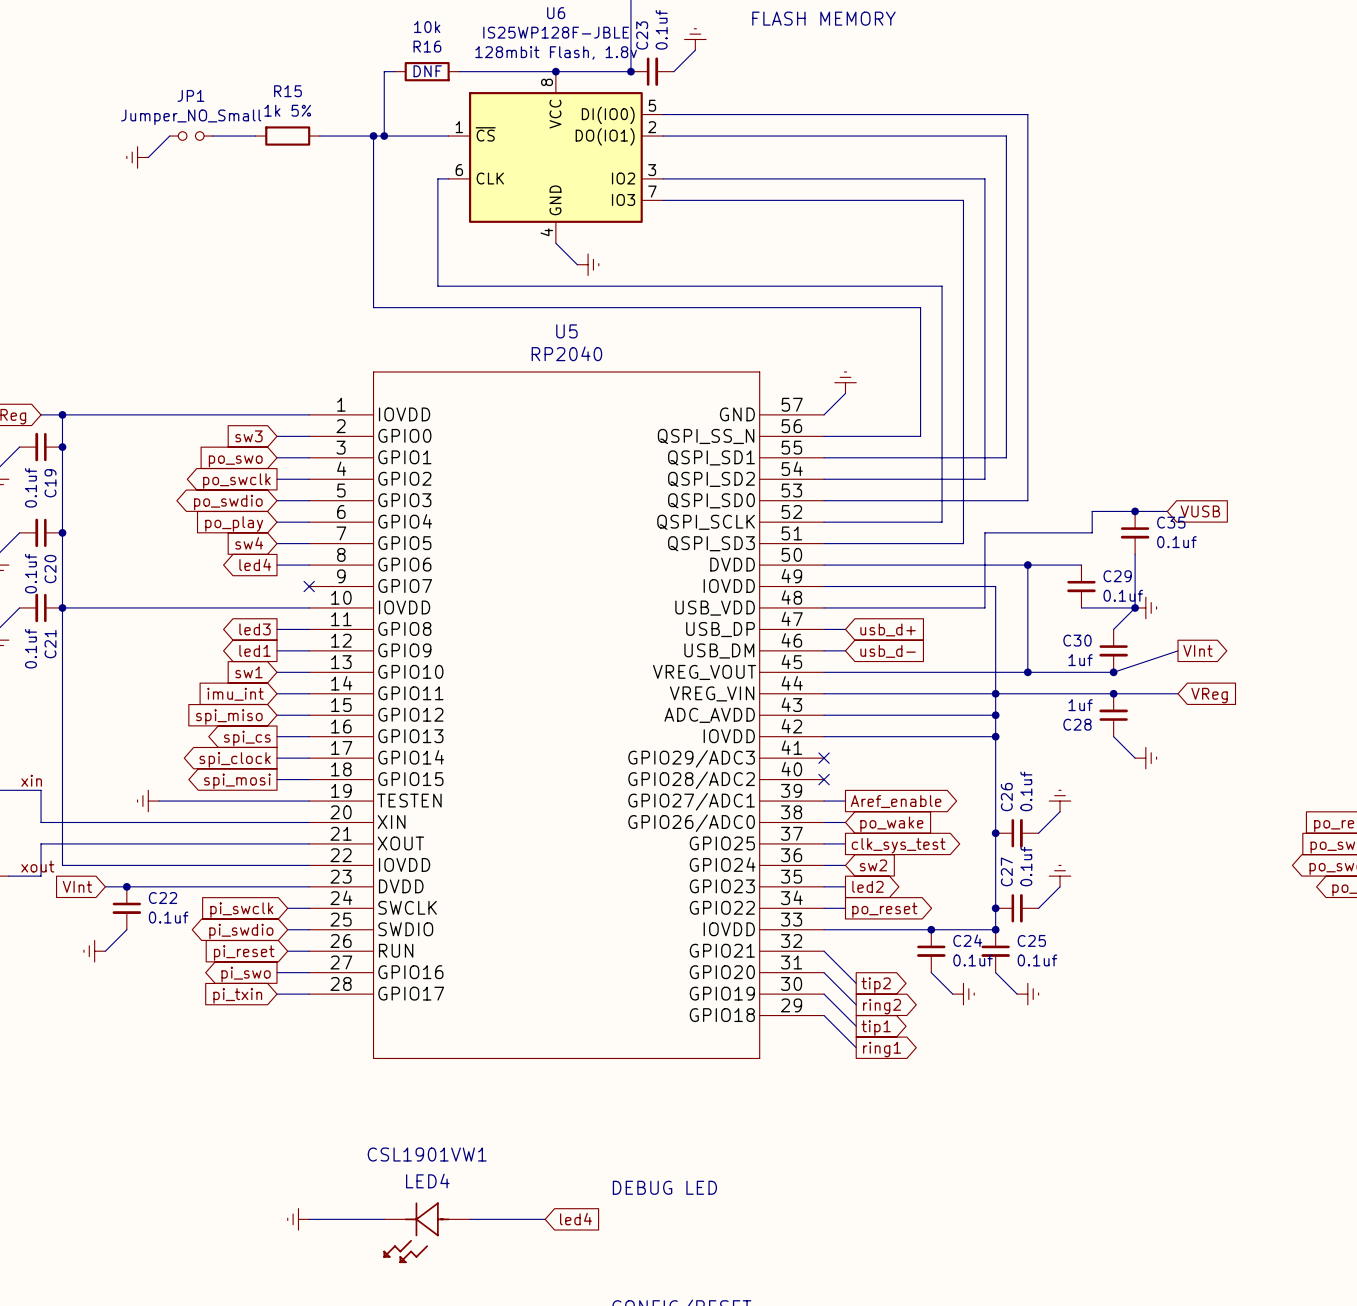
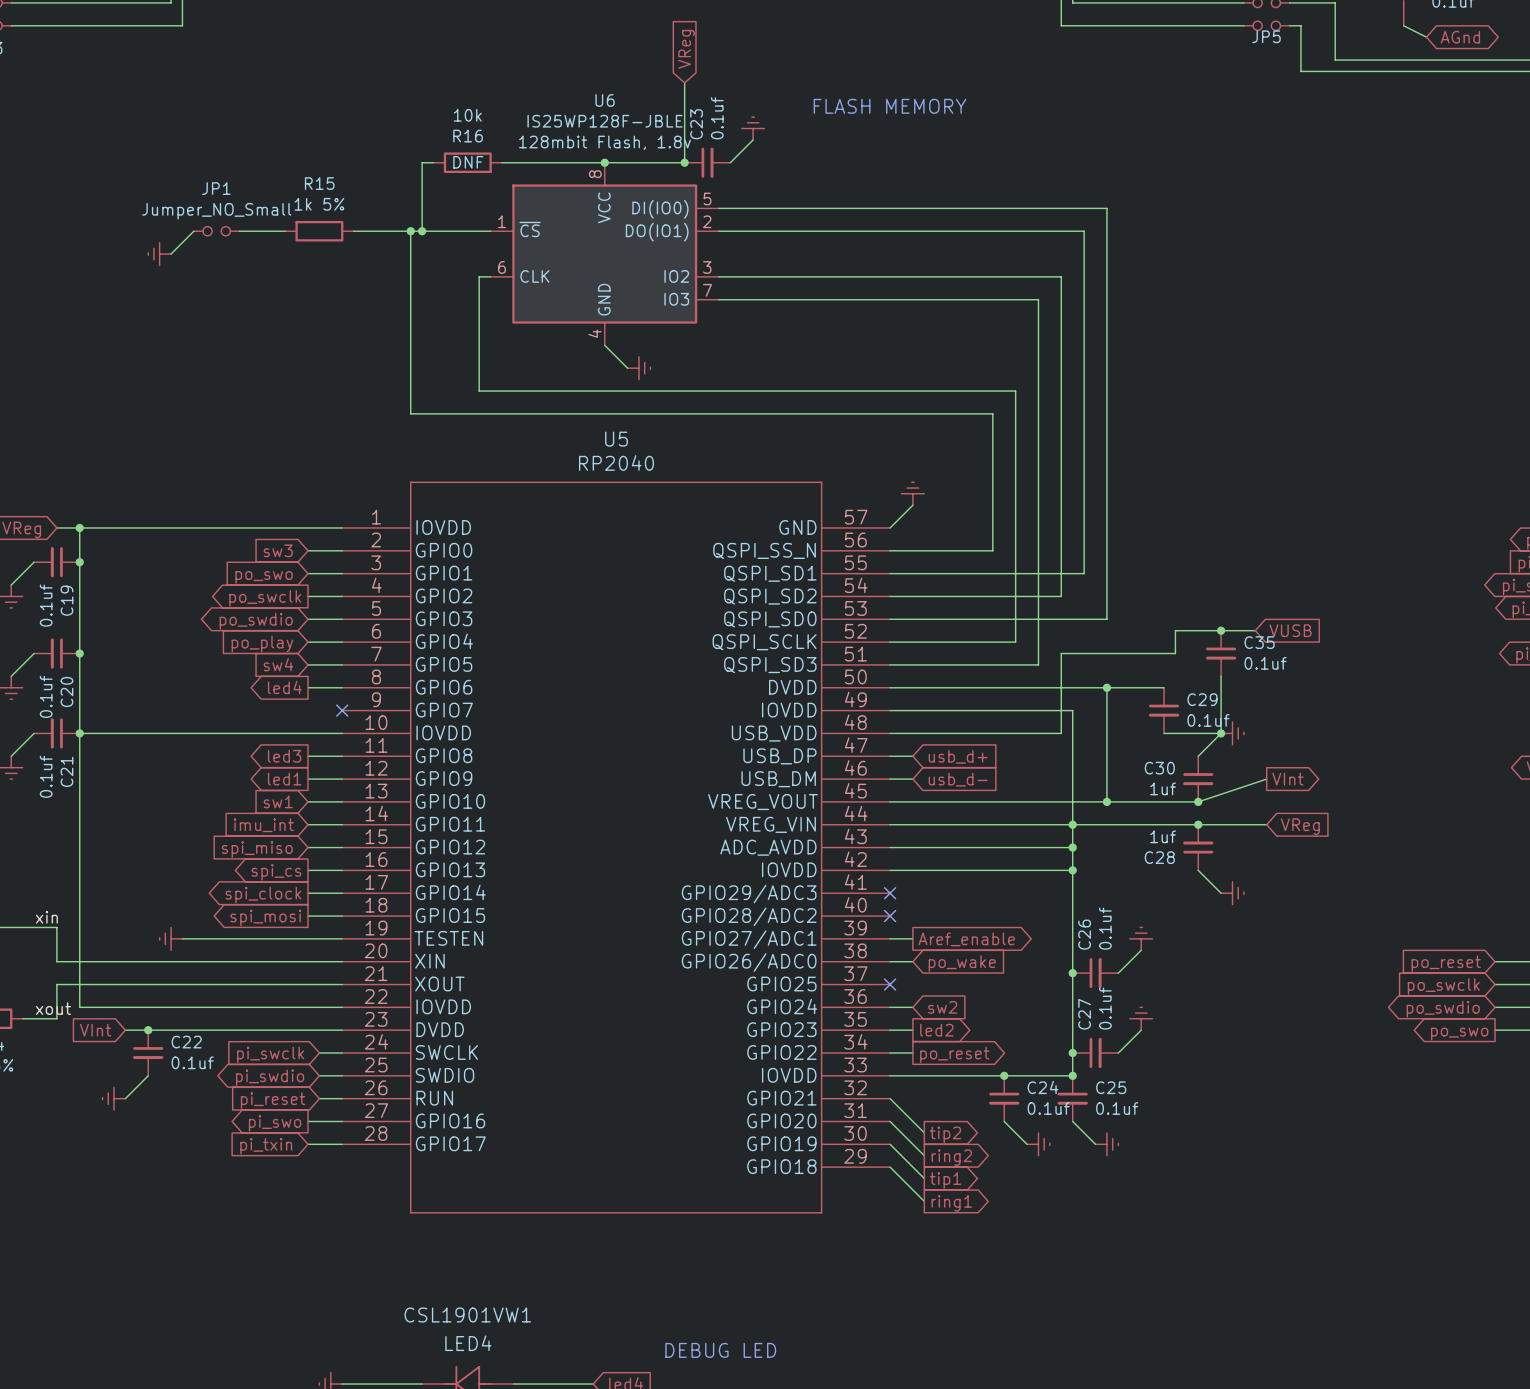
wire: (824, 843) (845, 843) -> none
no-connect mark: none -> (890, 984)
global label: clk_sys_test (898, 845) -> none

